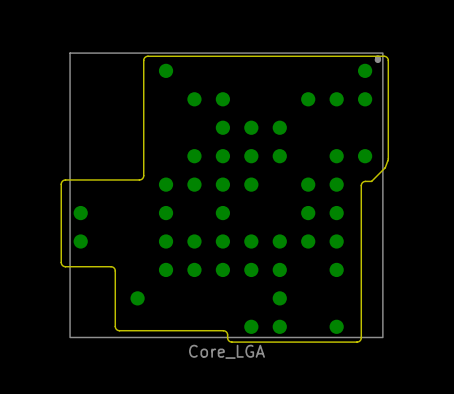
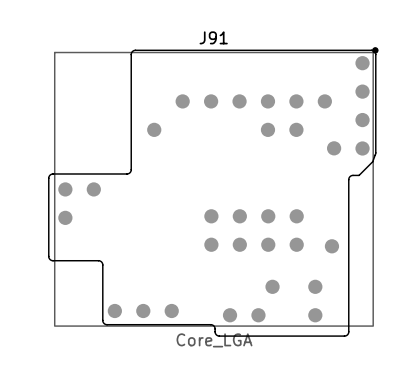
J91: none -> Core_LGA (216, 186)
part: Core_LGA (226, 195) -> none

